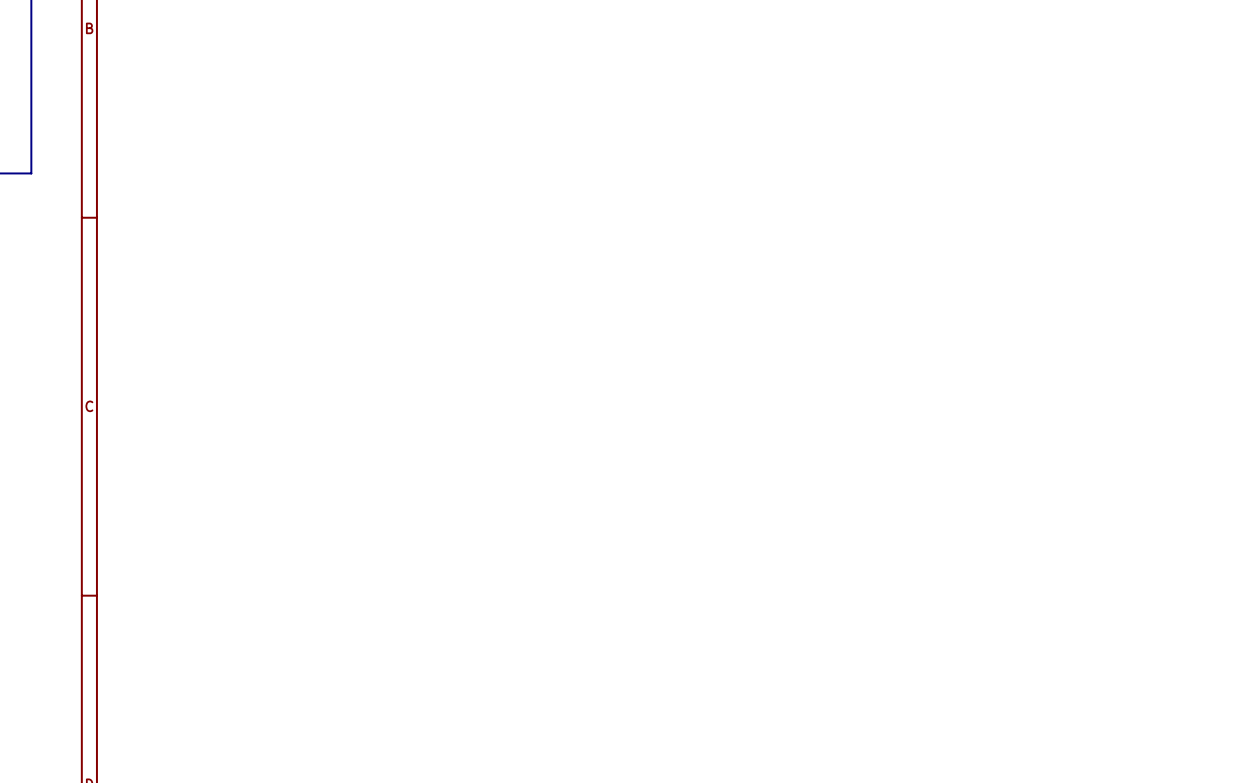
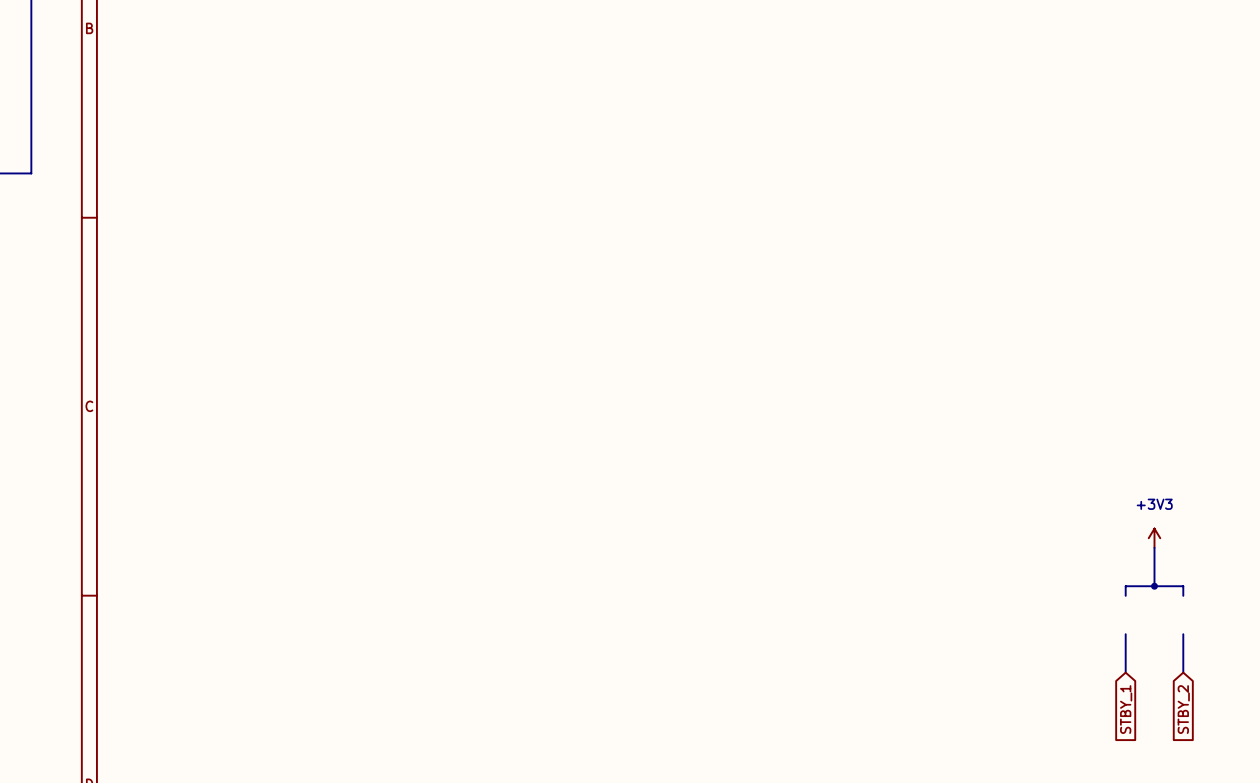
power symbol: none -> +3V3 (1154, 538)
wire: none -> (1154, 547) (1154, 586)
junction: none -> (1154, 586)
wire: none -> (1125, 595) (1125, 586) (1183, 586) (1183, 595)
wire: none -> (1125, 634) (1125, 672)
wire: none -> (1183, 634) (1183, 672)
global label: none -> STBY_1 (1126, 709)
global label: none -> STBY_2 (1183, 709)

